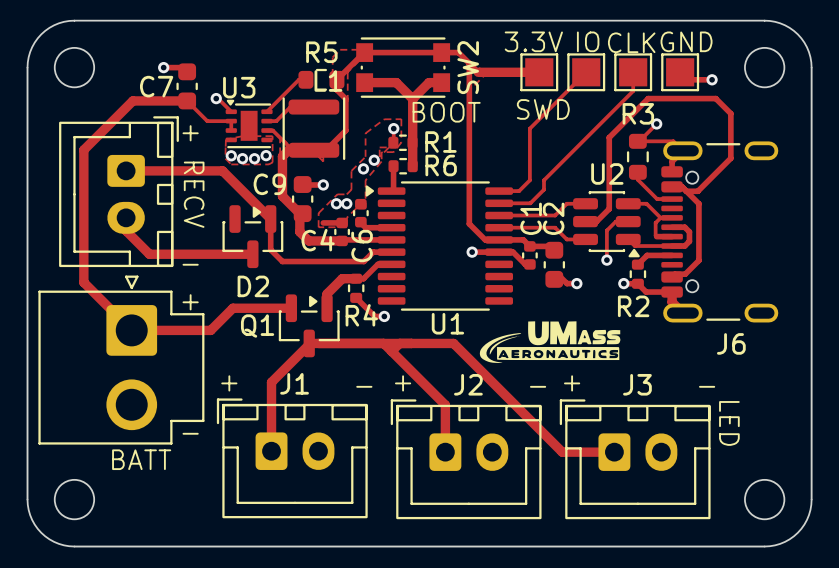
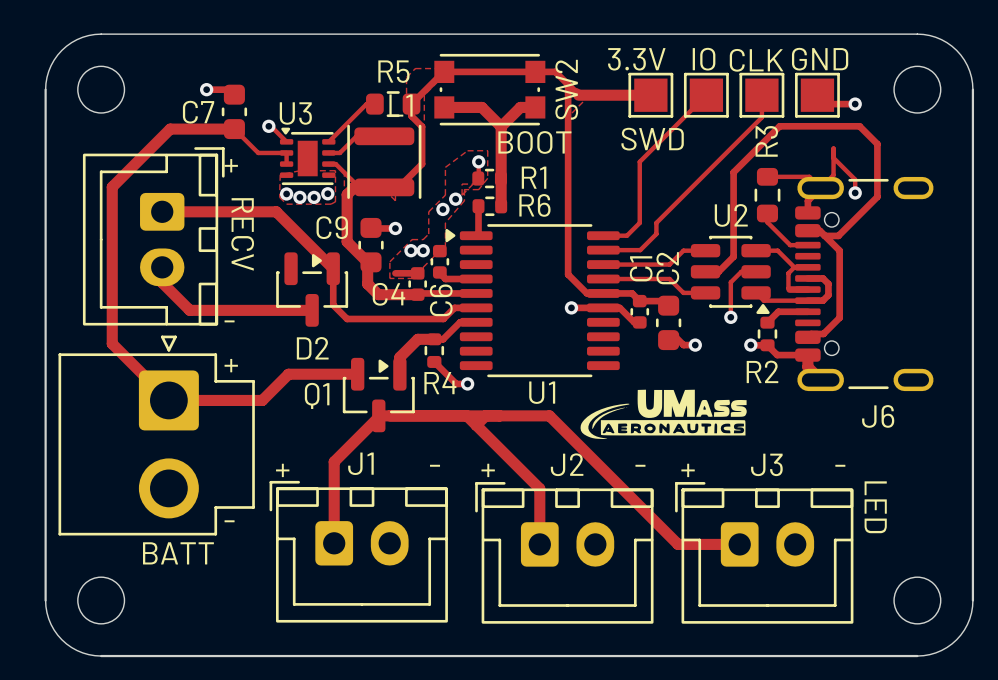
R3 name rotation: 0° (638, 113) -> 90° counterclockwise (766, 141)
track: none -> (833, 148) (833, 175) (820, 188)
track: (656, 123) (639, 141) -> none
via position: (656, 123) -> (855, 192)
track: none -> (833, 157) (855, 179) (855, 192)

